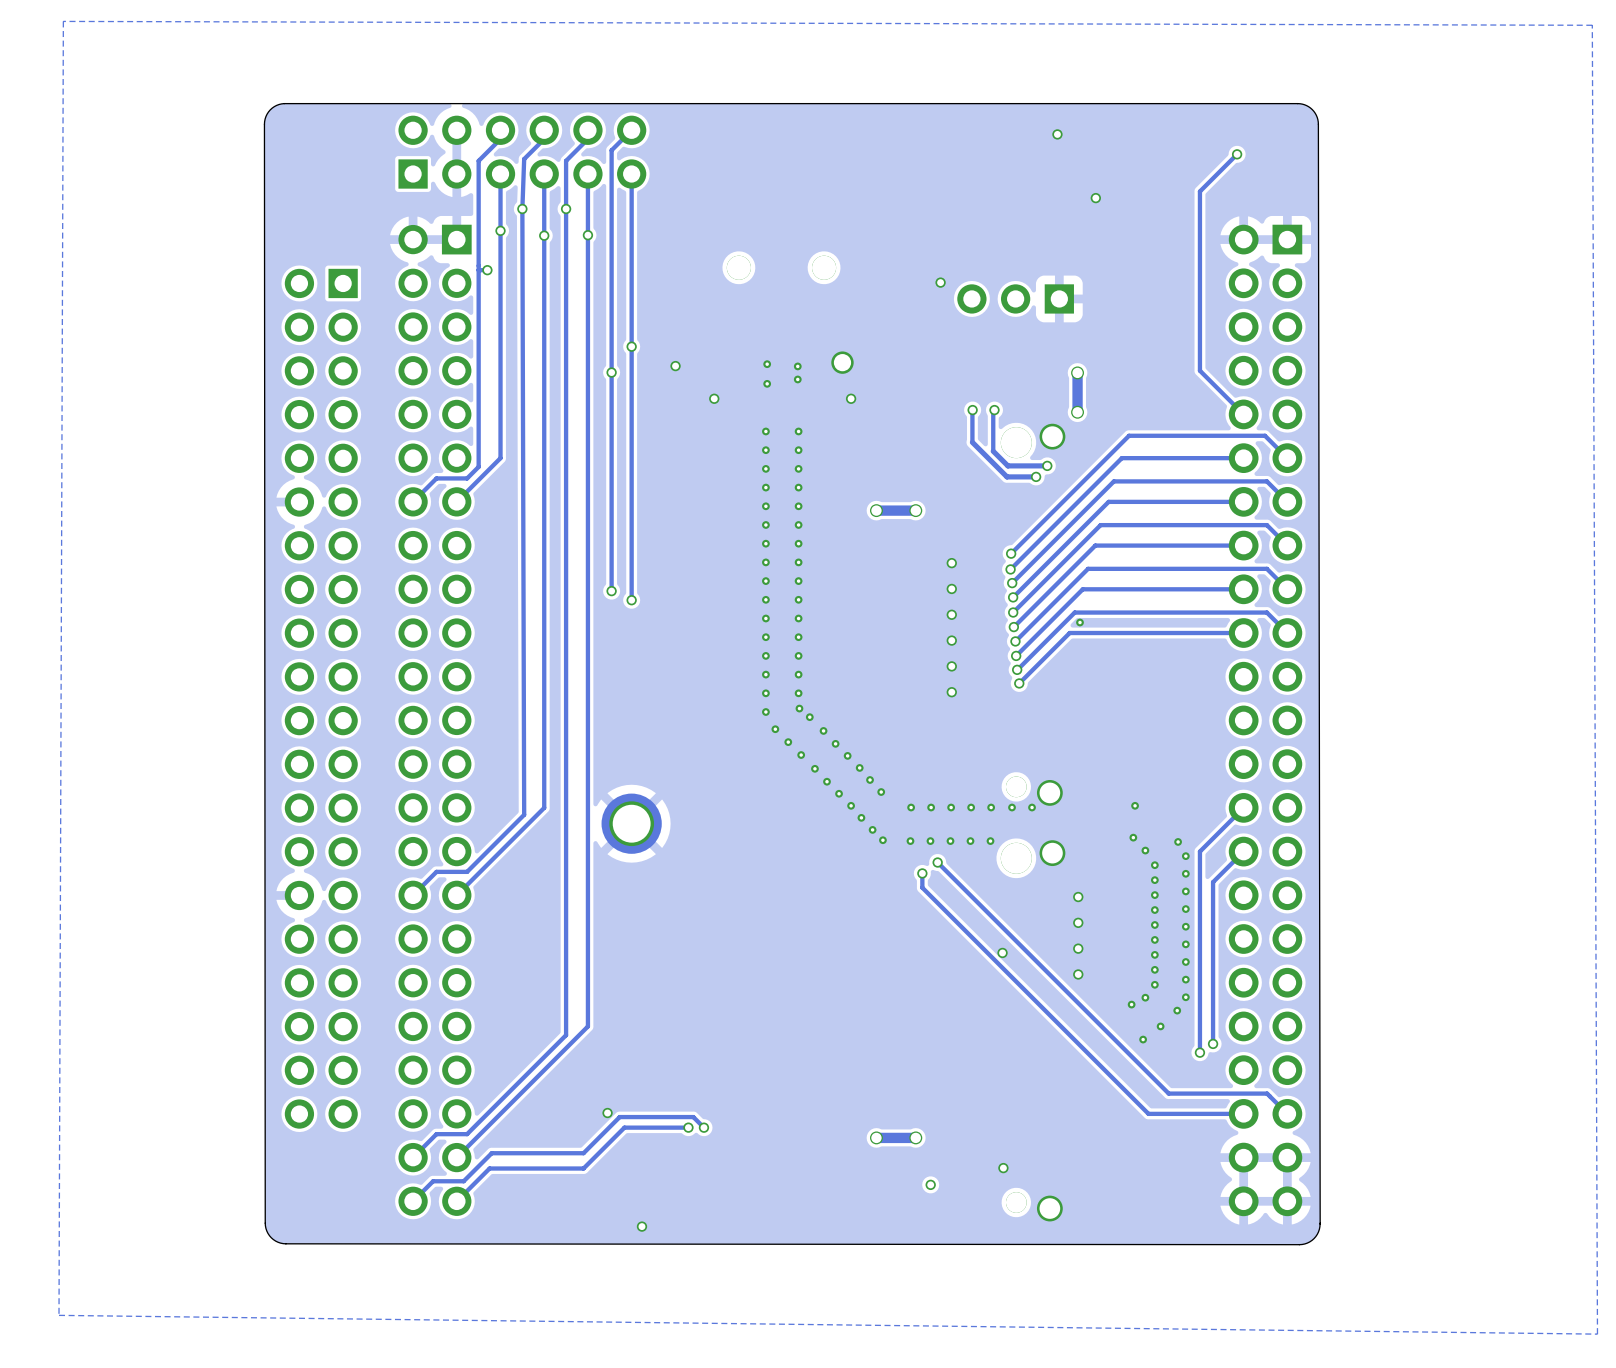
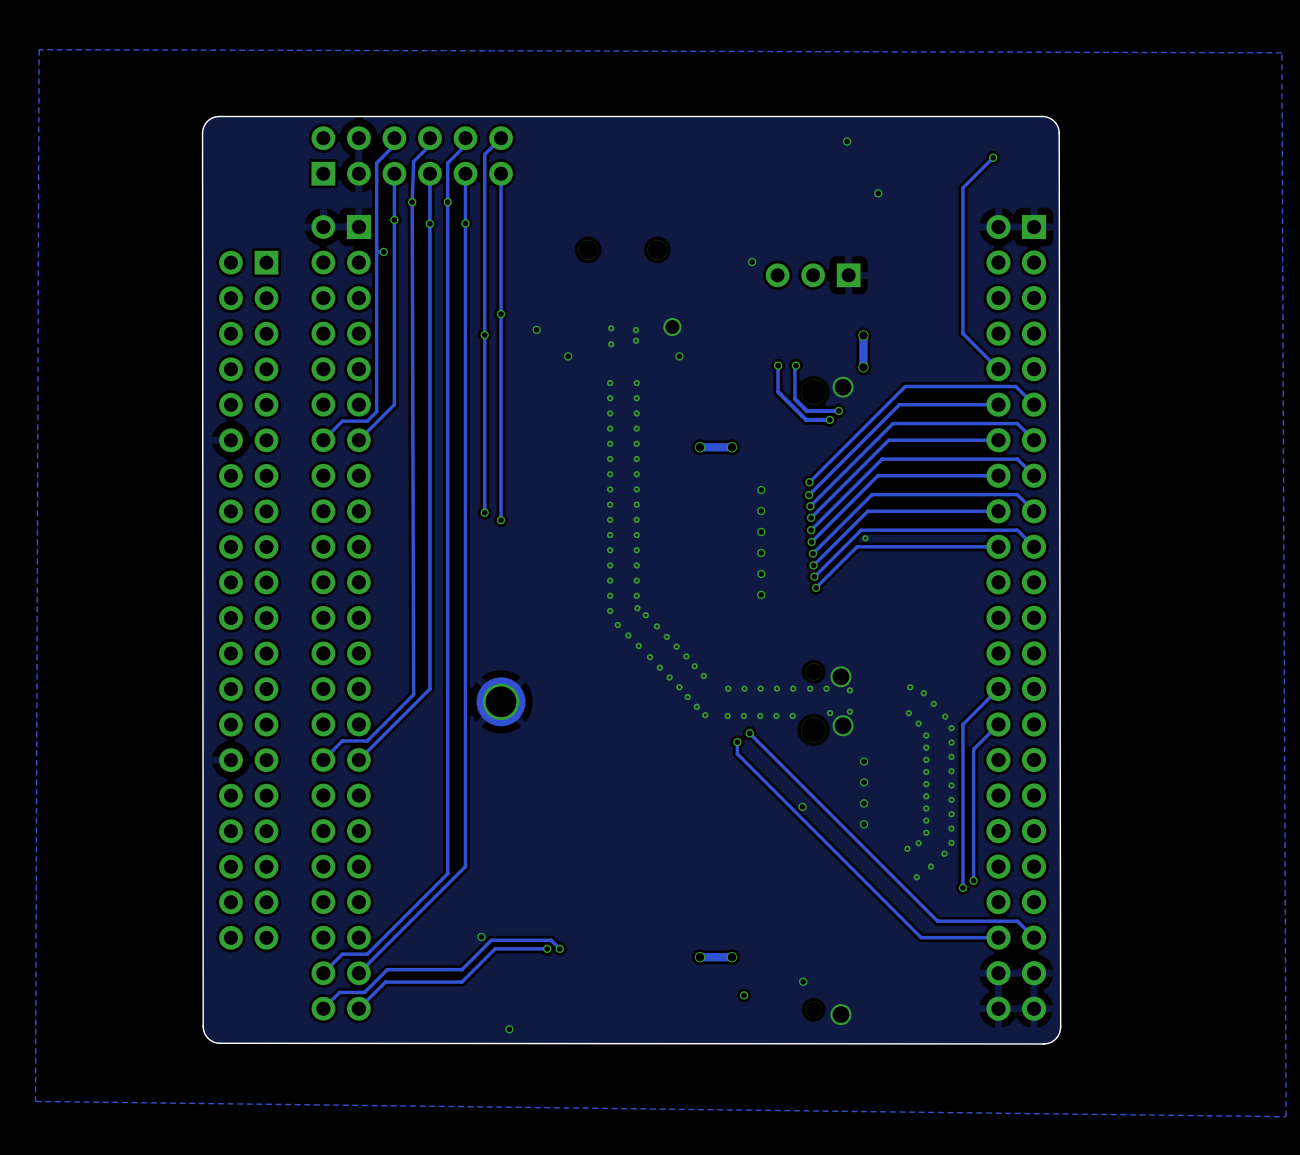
via: none -> (849, 690)
via: none -> (923, 693)
via: none -> (933, 703)
via: none -> (849, 711)
via: none -> (830, 713)

